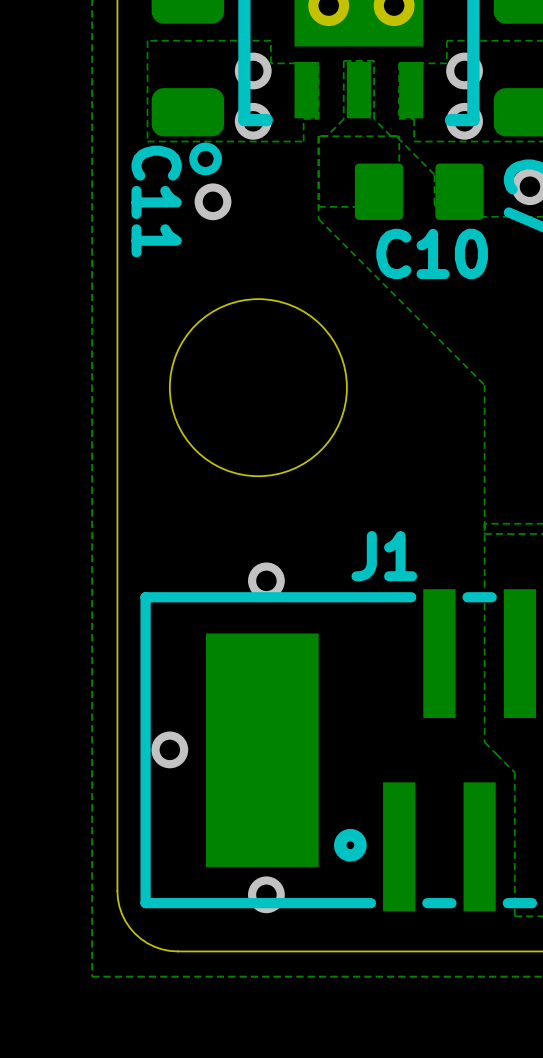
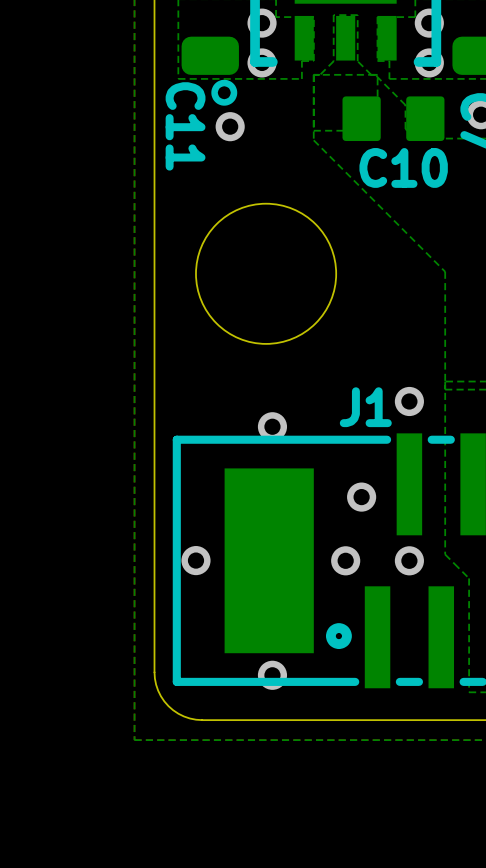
via: none -> (409, 401)
via: none -> (361, 497)
via: none -> (345, 560)
via: none -> (409, 560)

